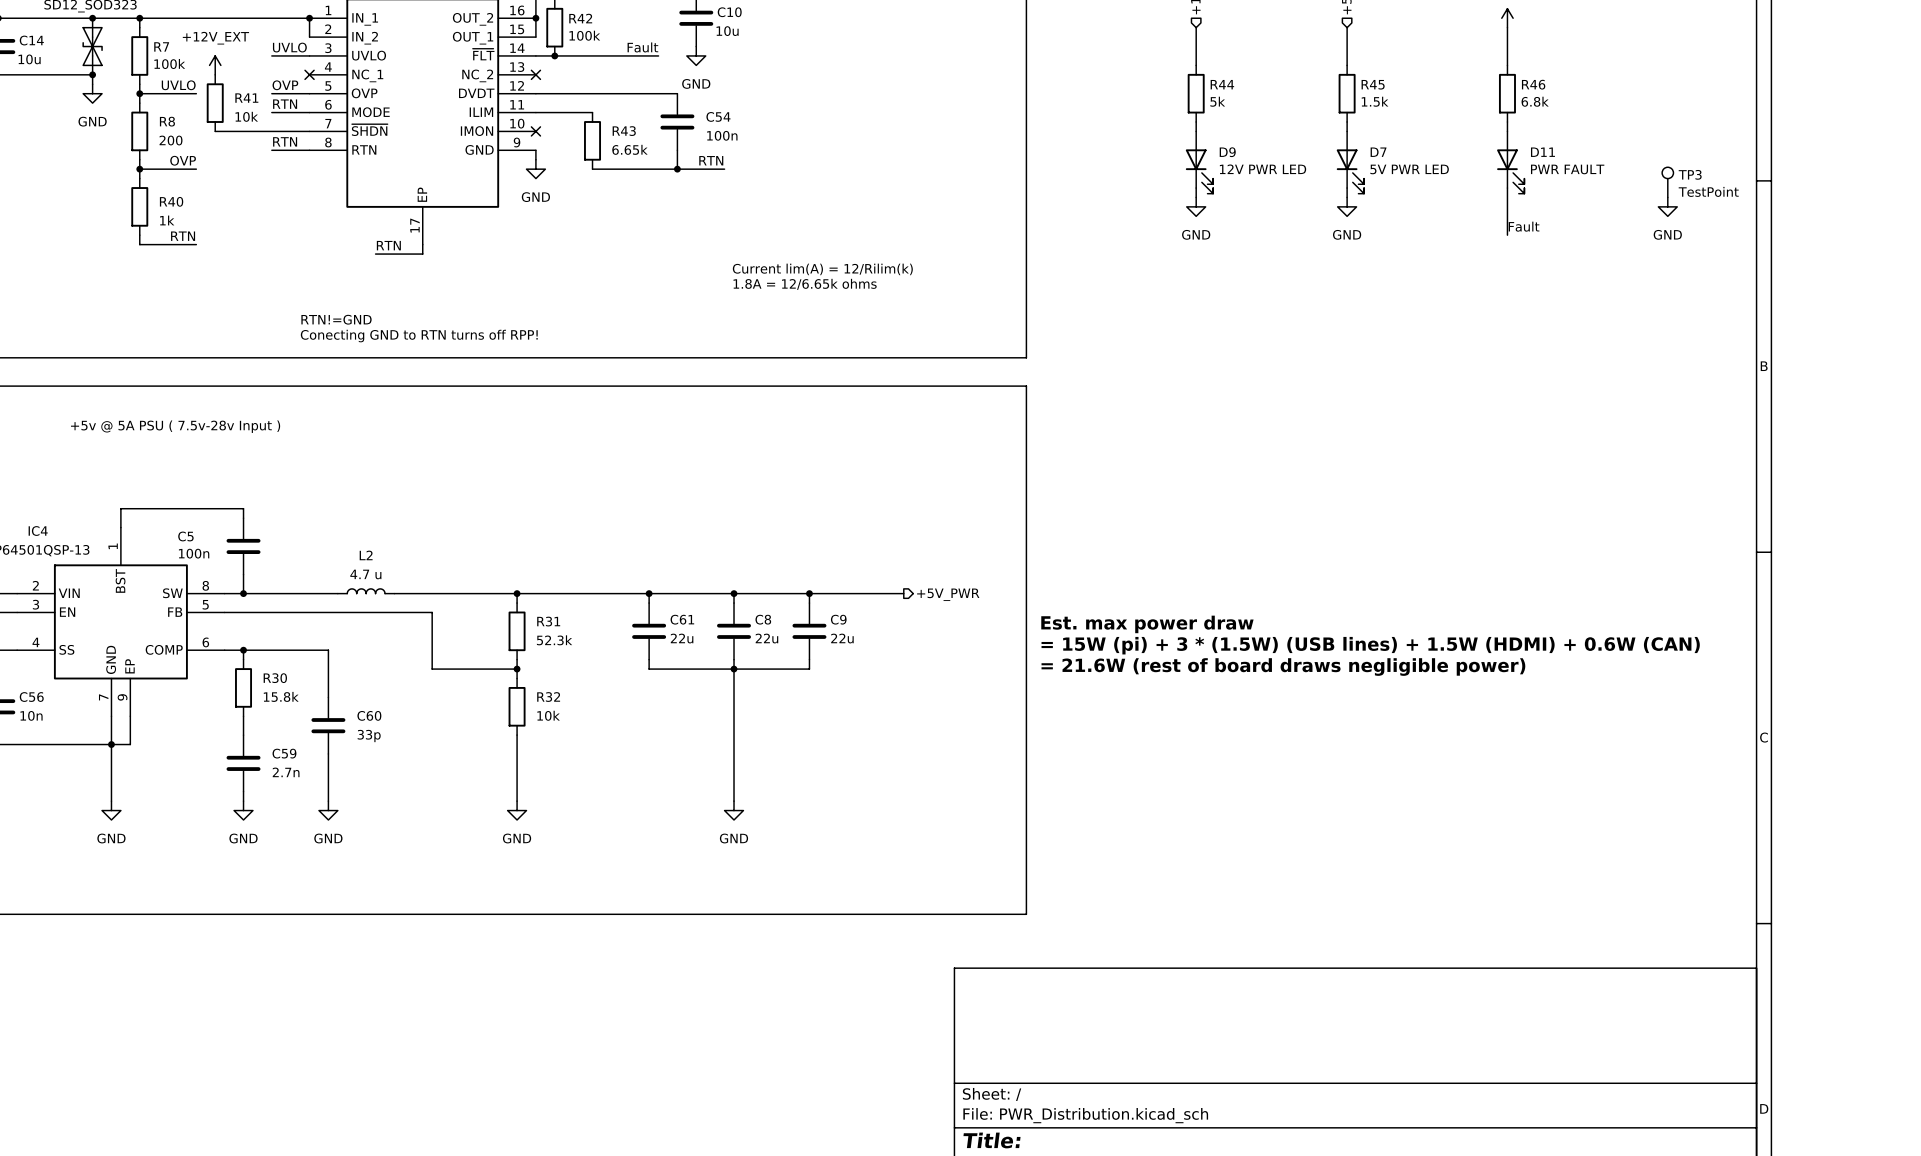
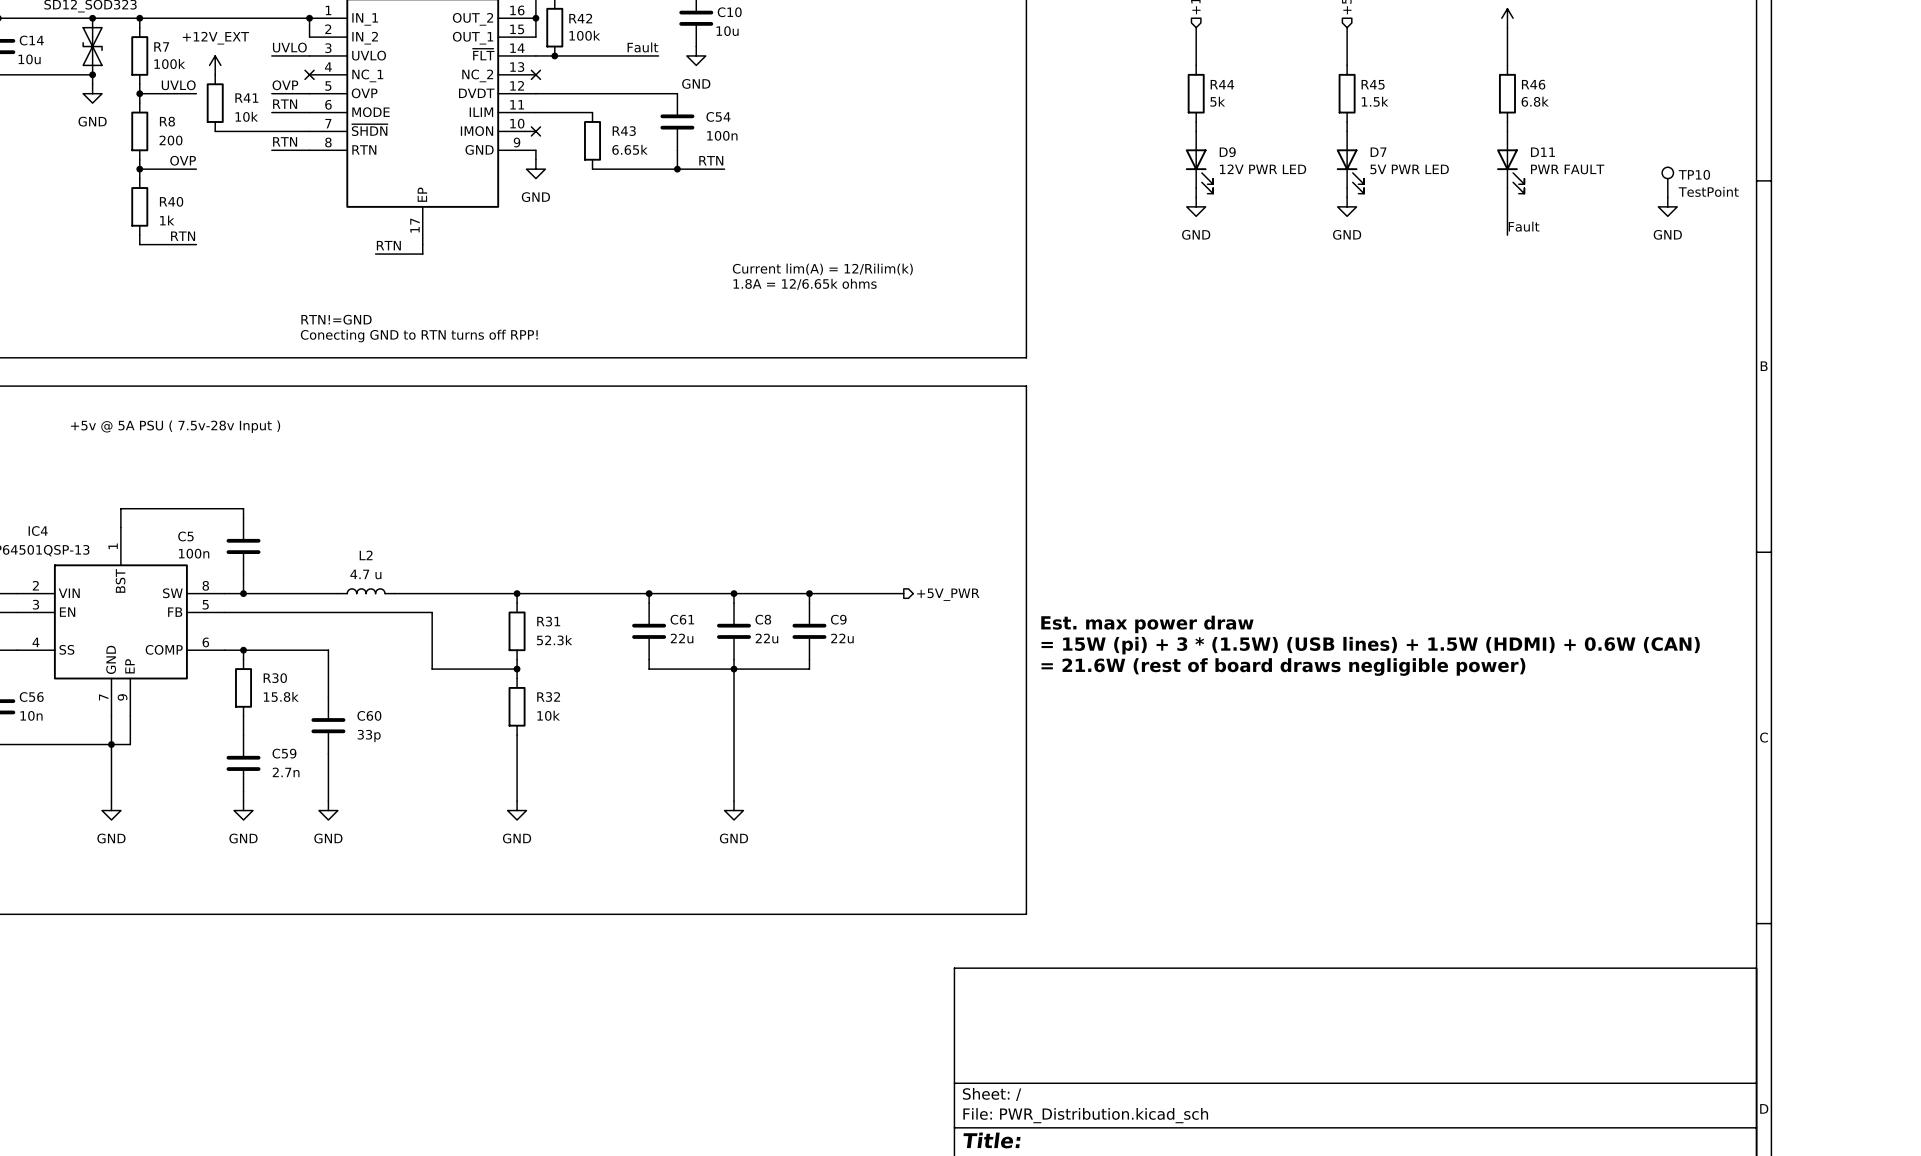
TP3 name: TP3 (1690, 174) -> TP10 (1694, 174)

